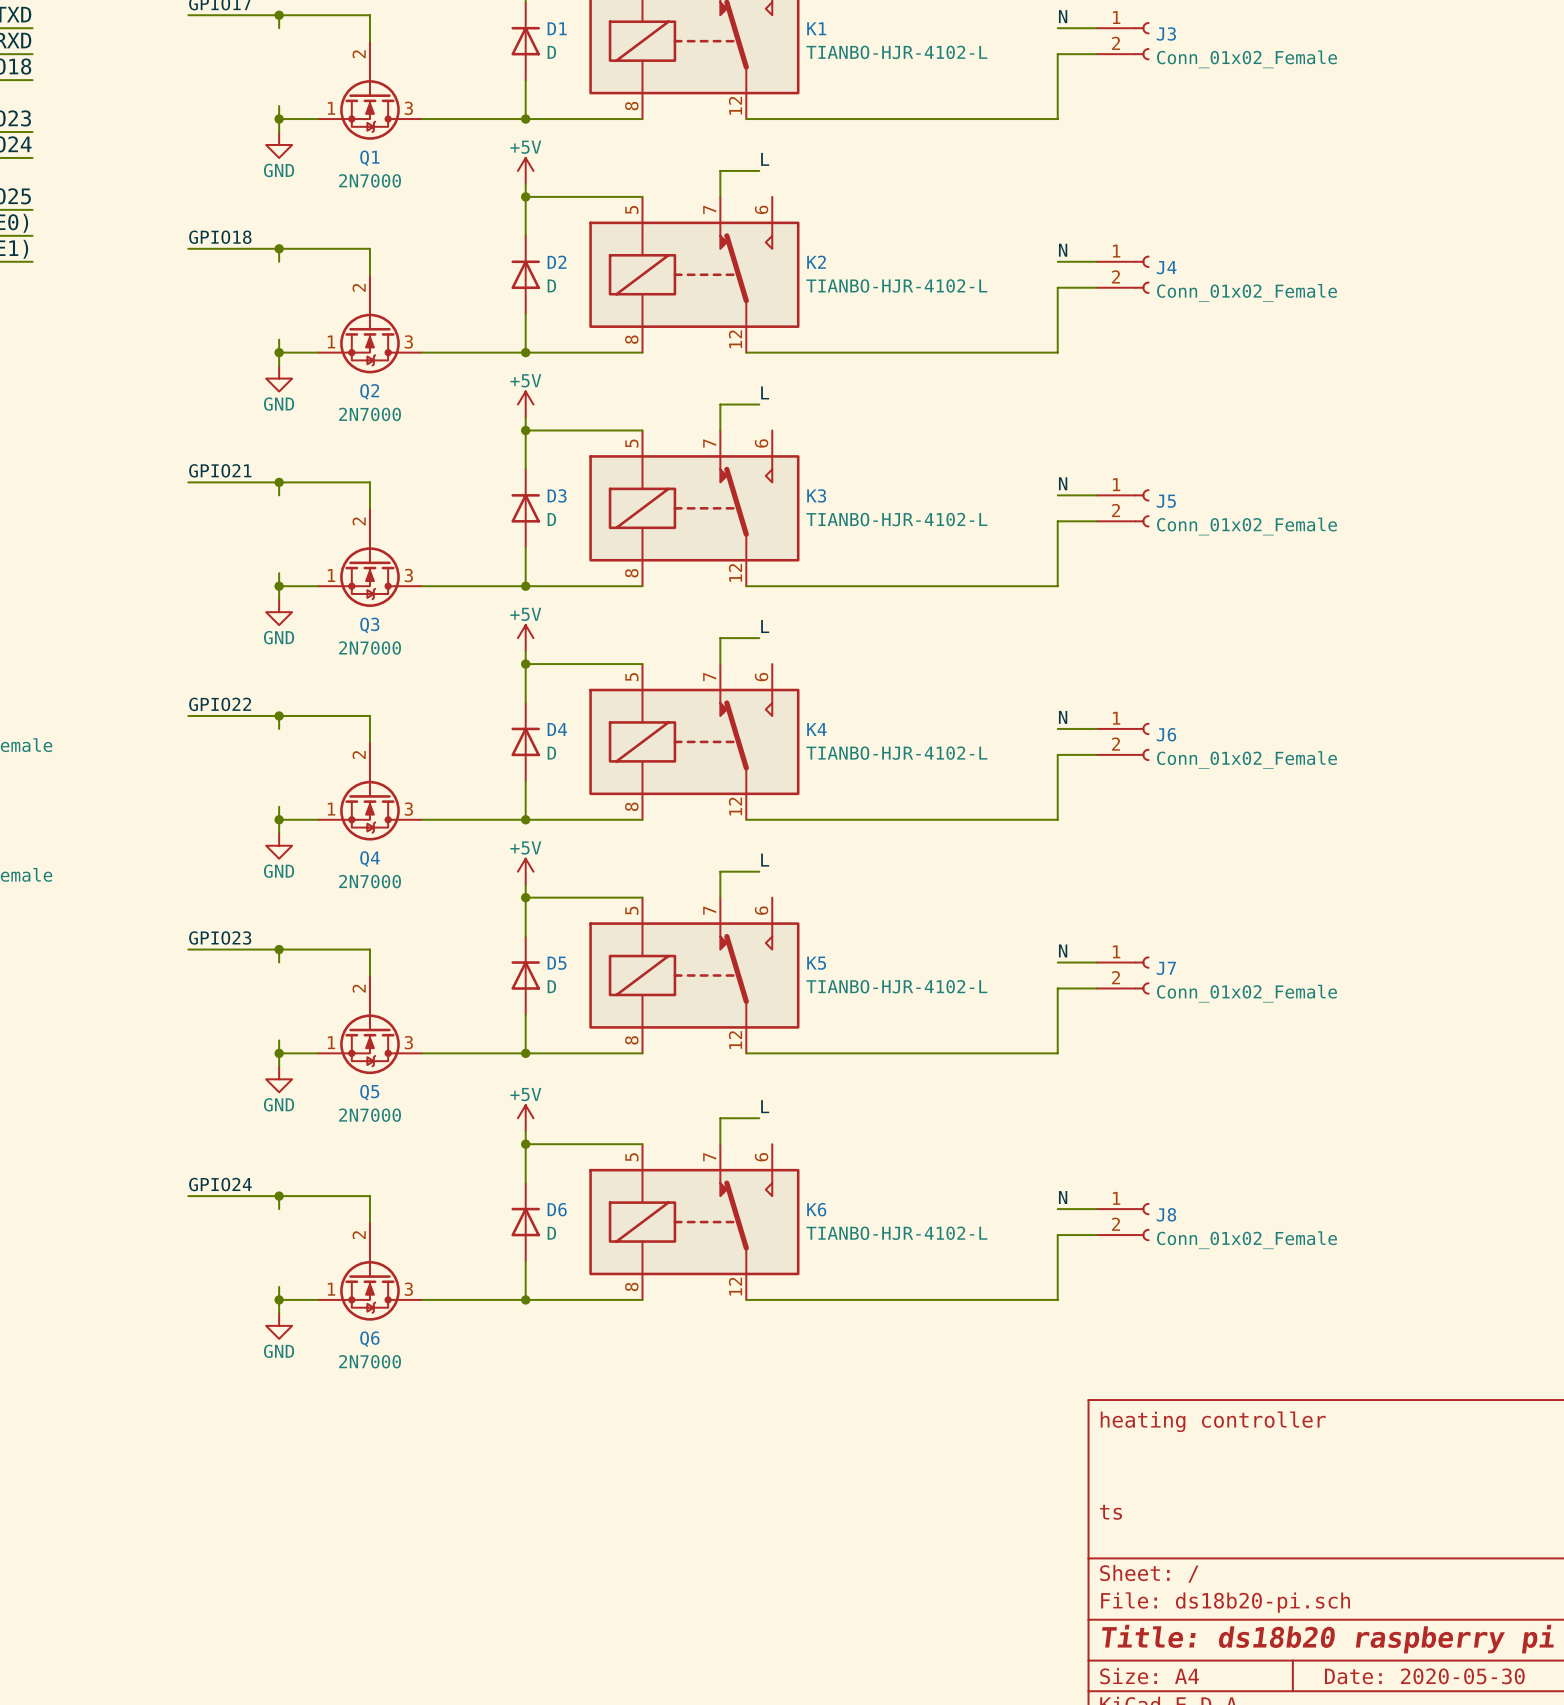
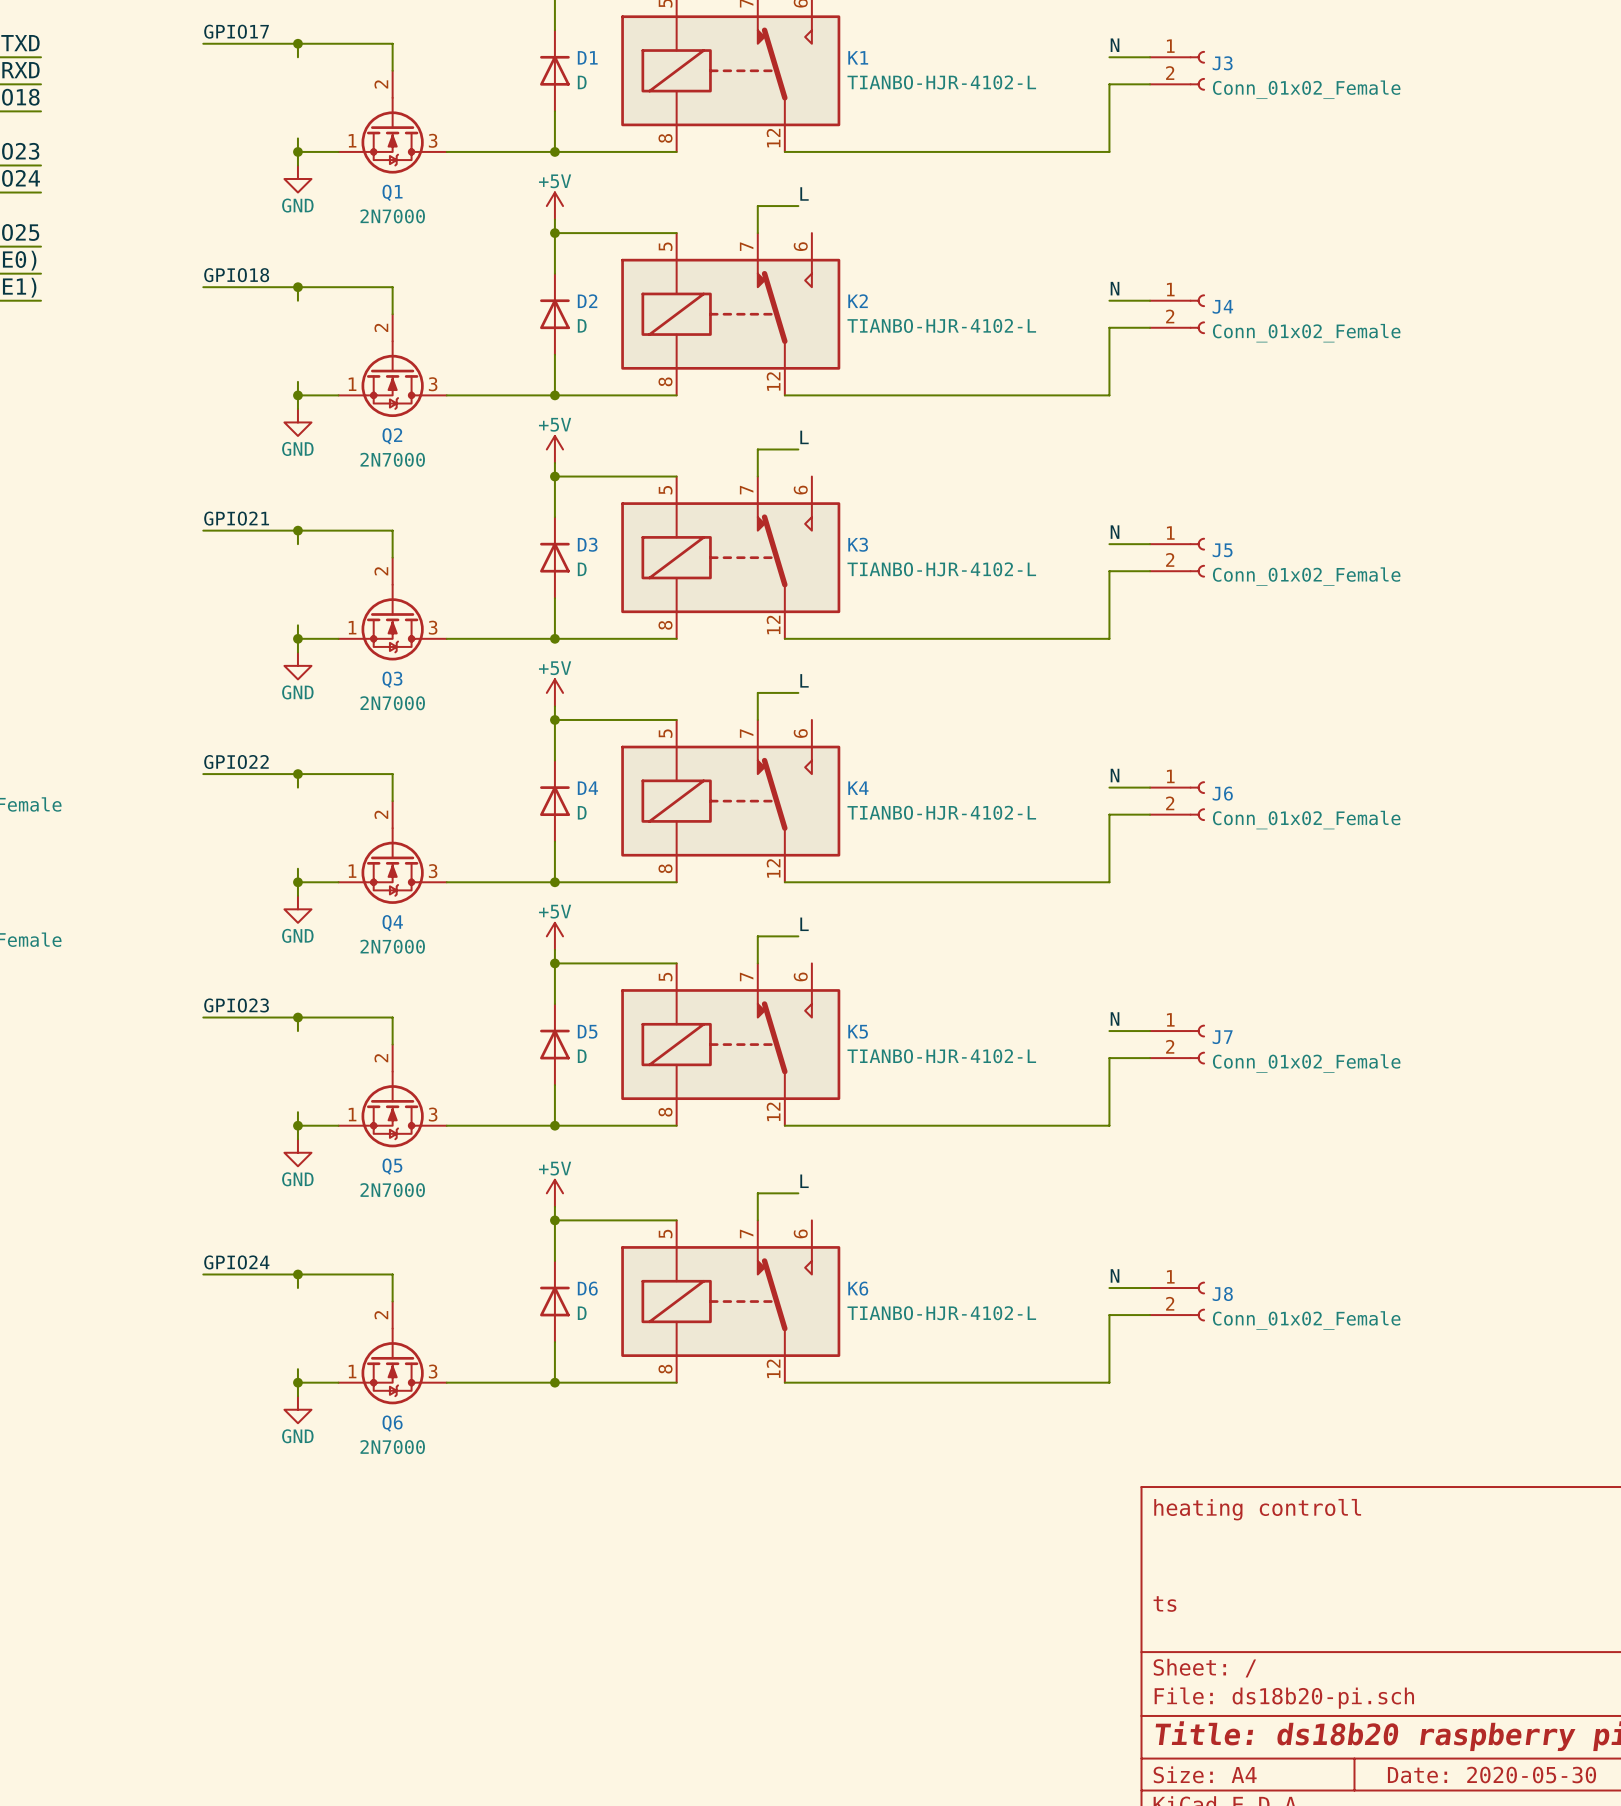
title block: heating controller (1213, 1421) -> heating controll (1257, 1509)

